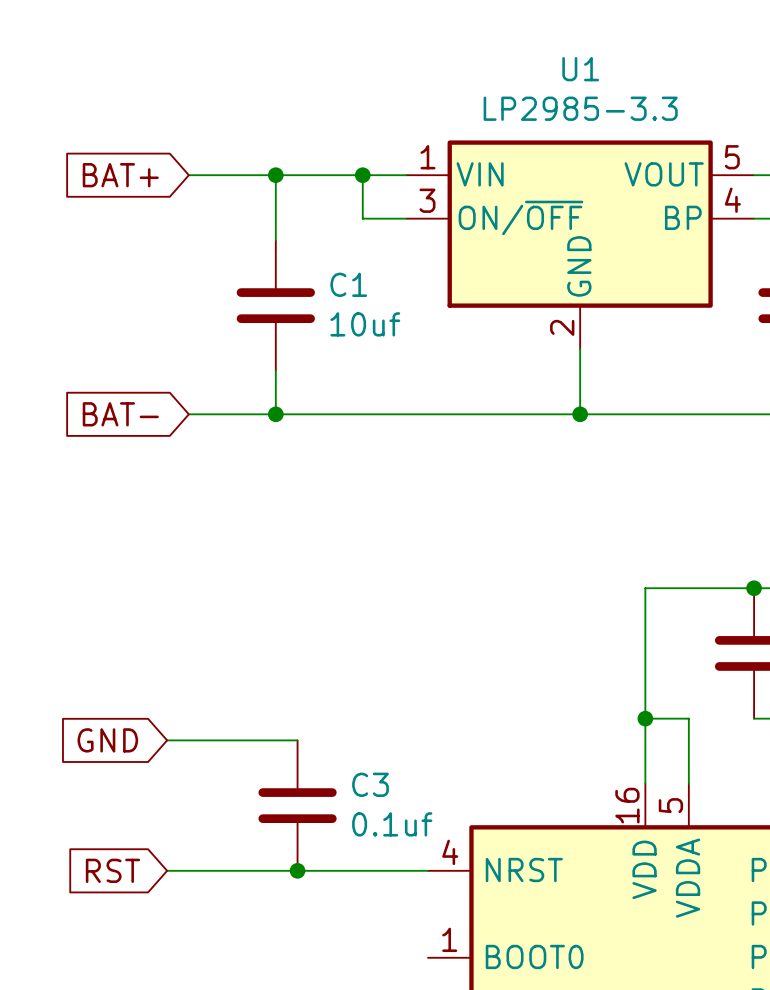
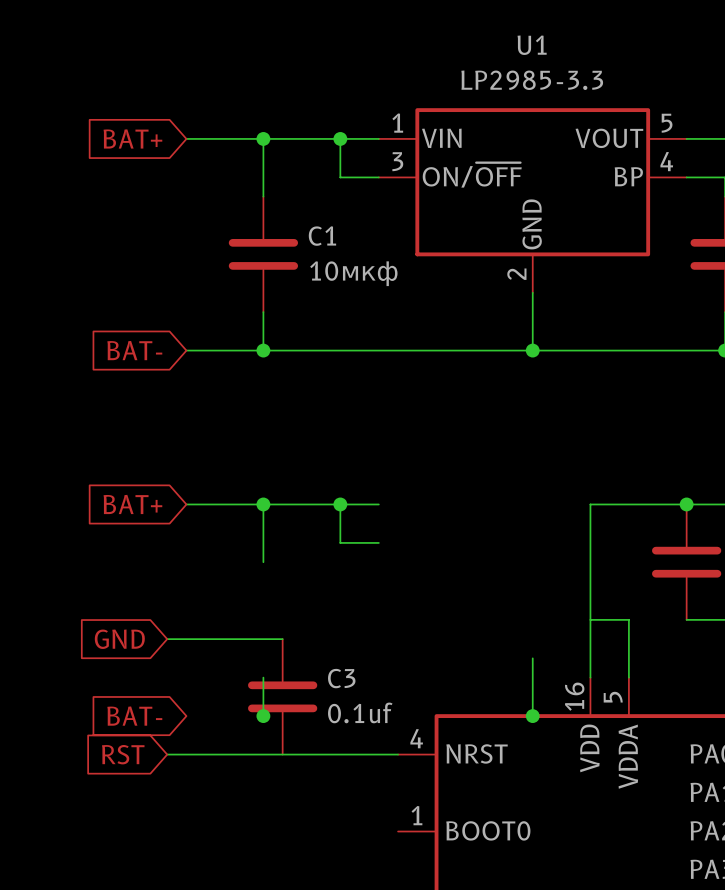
C1 value: 10uf (365, 324) -> 10мкф (353, 273)
global label: none -> BAT+ (132, 504)
wire: none -> (186, 504) (378, 504)
wire: none -> (263, 504) (263, 562)
junction: none -> (263, 504)
wire: none -> (340, 504) (340, 542) (378, 542)
junction: none -> (340, 504)
junction: (645, 718) -> none
wire: none -> (532, 658) (532, 716)
wire: none -> (263, 677) (263, 716)
global label: none -> BAT- (134, 716)
junction: none -> (532, 716)
junction position: (297, 870) -> (263, 716)

